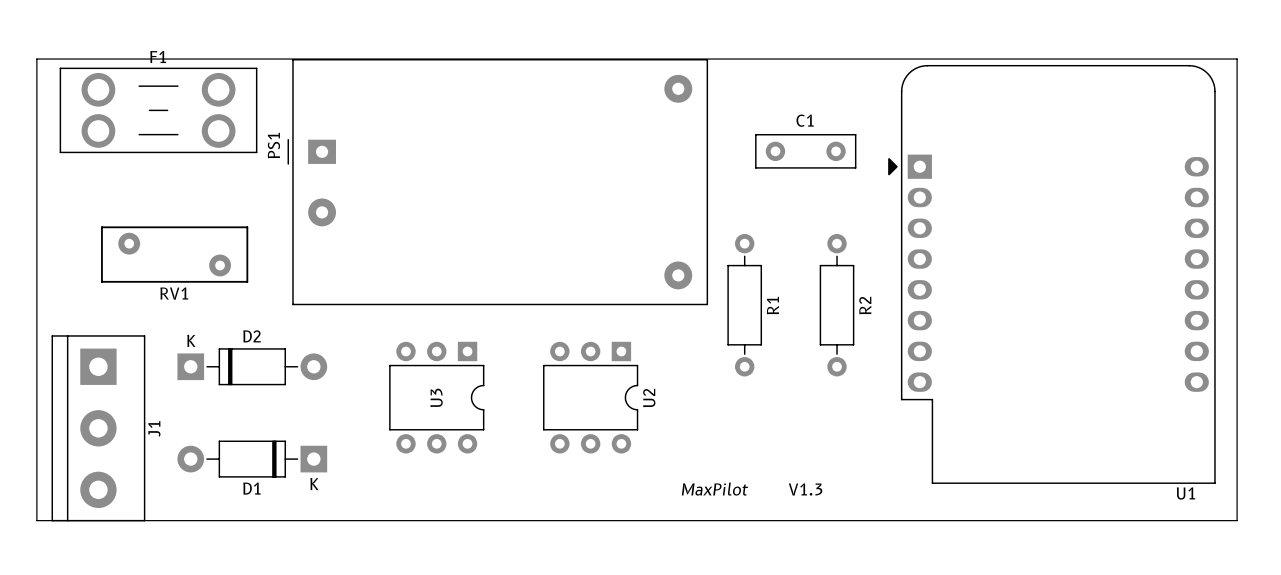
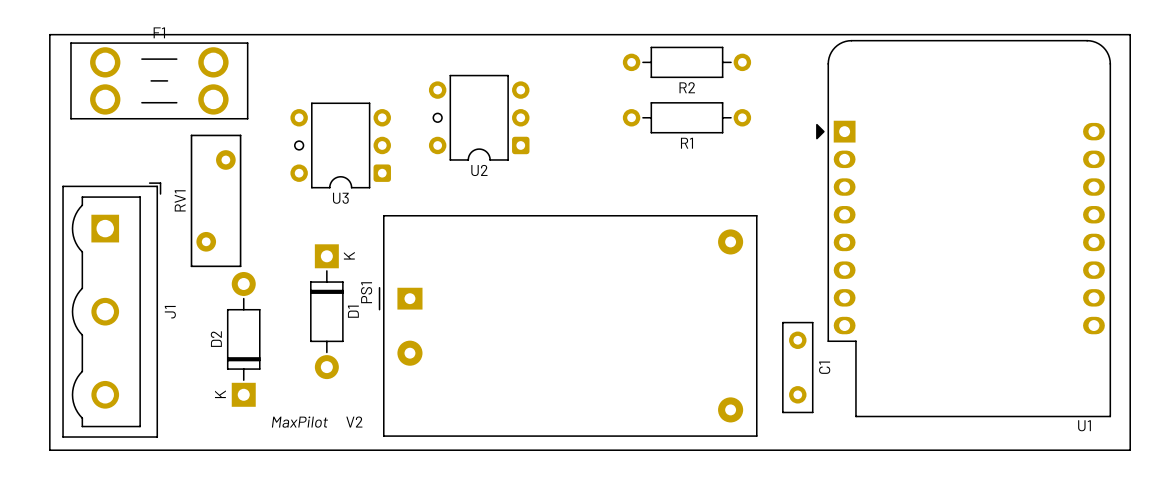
C1 rotation: 0° (805, 151) -> 90° clockwise (797, 367)
C1 position: (805, 151) -> (797, 367)
PS1 position: (497, 182) -> (568, 325)
RV1 rotation: 0° (174, 254) -> 90° clockwise (216, 200)
R1 rotation: 0° (744, 305) -> 90° clockwise (686, 117)
R1 position: (744, 305) -> (686, 117)
R2 rotation: 0° (837, 305) -> 90° clockwise (686, 62)
R2 position: (837, 305) -> (686, 62)
J1 footprint: [51, 335, 146, 522] -> [62, 182, 162, 438]
U3 footprint: [389, 341, 485, 454] -> [290, 102, 391, 189]
U2 footprint: [543, 341, 639, 454] -> [428, 74, 530, 161]
D2 rotation: 0° (252, 366) -> 90° counterclockwise (243, 339)
U3 name position: U3 (436, 397) -> U3 (340, 198)
U2 name position: U2 (649, 398) -> U2 (479, 170)
D1 rotation: 0° (252, 459) -> 90° counterclockwise (326, 311)
D1 position: (252, 459) -> (326, 311)
text: none -> MaxPilot (299, 422)
text: none -> V2 (354, 422)
text: MaxPilot (714, 489) -> none
text: V1.3 (805, 489) -> none

